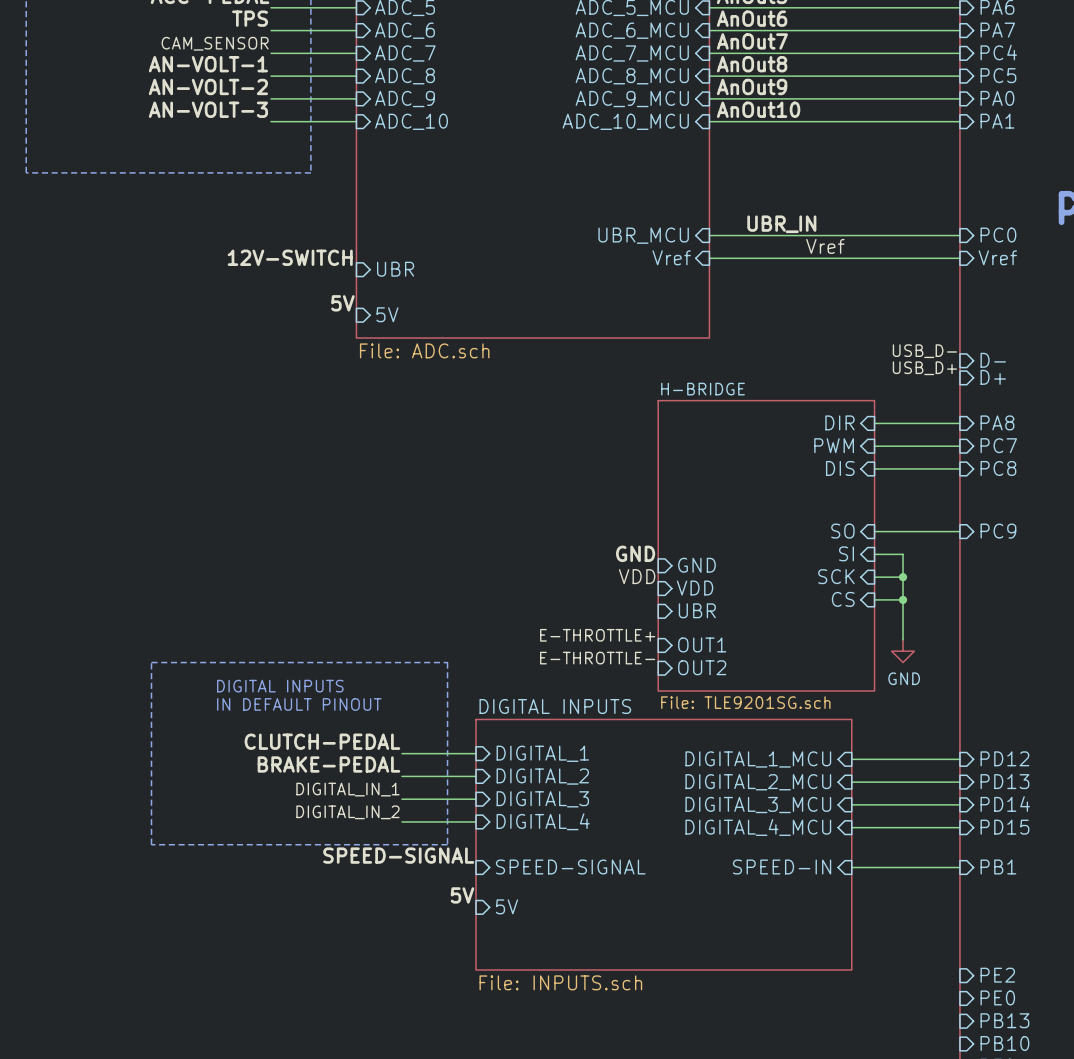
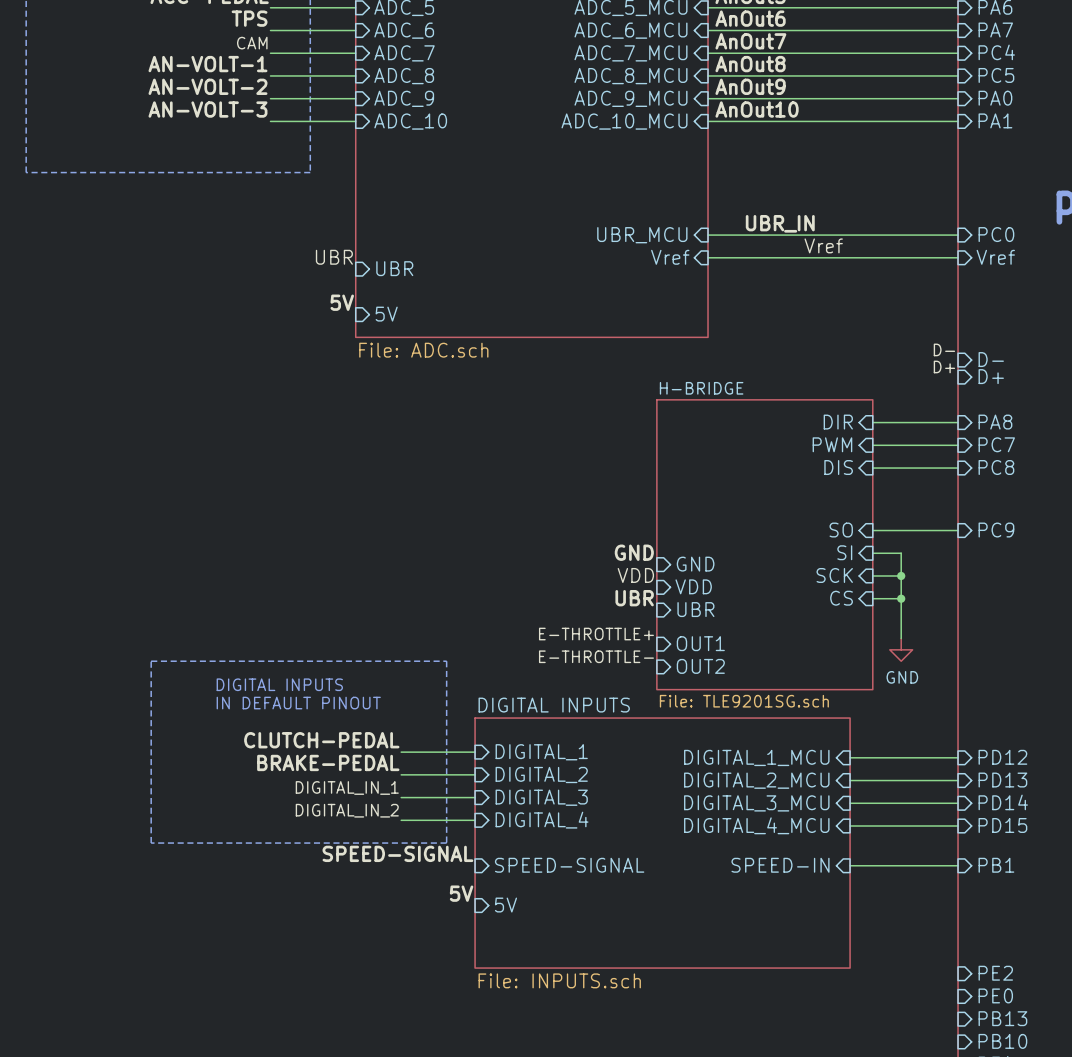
label: CAM_SENSOR (215, 43) -> CAM (252, 43)
label: 12V-SWITCH (290, 257) -> UBR (334, 257)
label: USB_D- (924, 351) -> D- (944, 349)
label: USB_D+ (924, 368) -> D+ (944, 366)
label: none -> UBR (634, 598)

